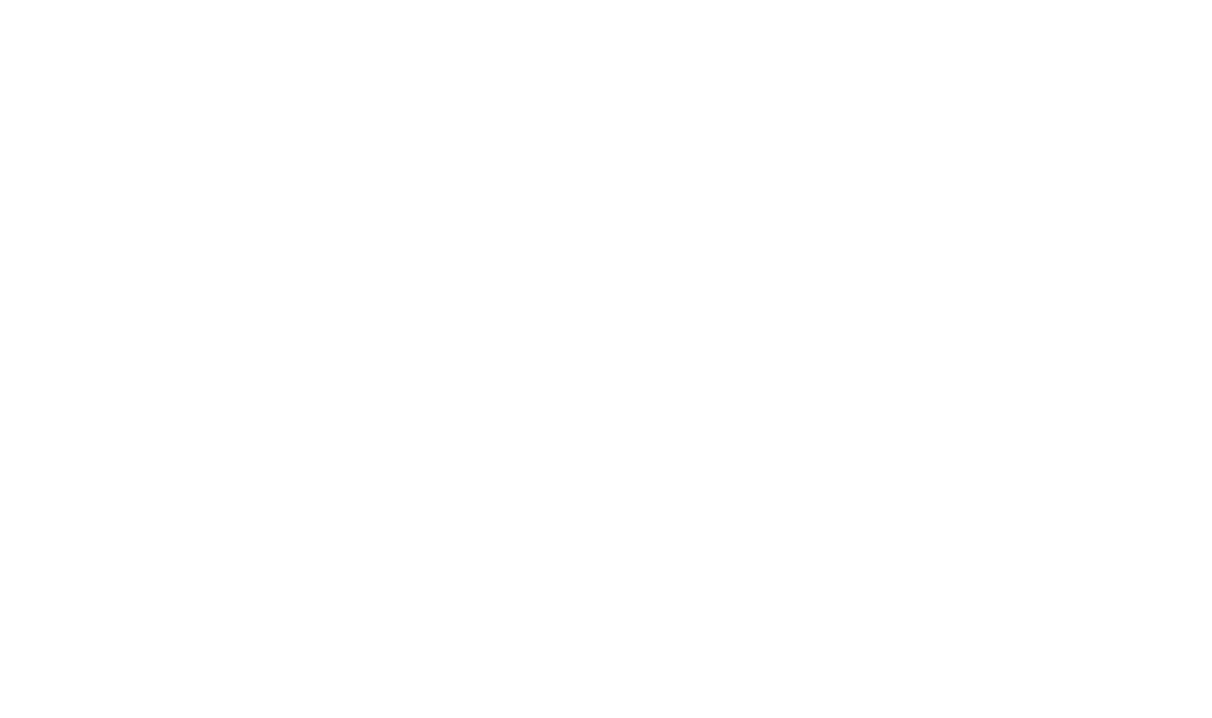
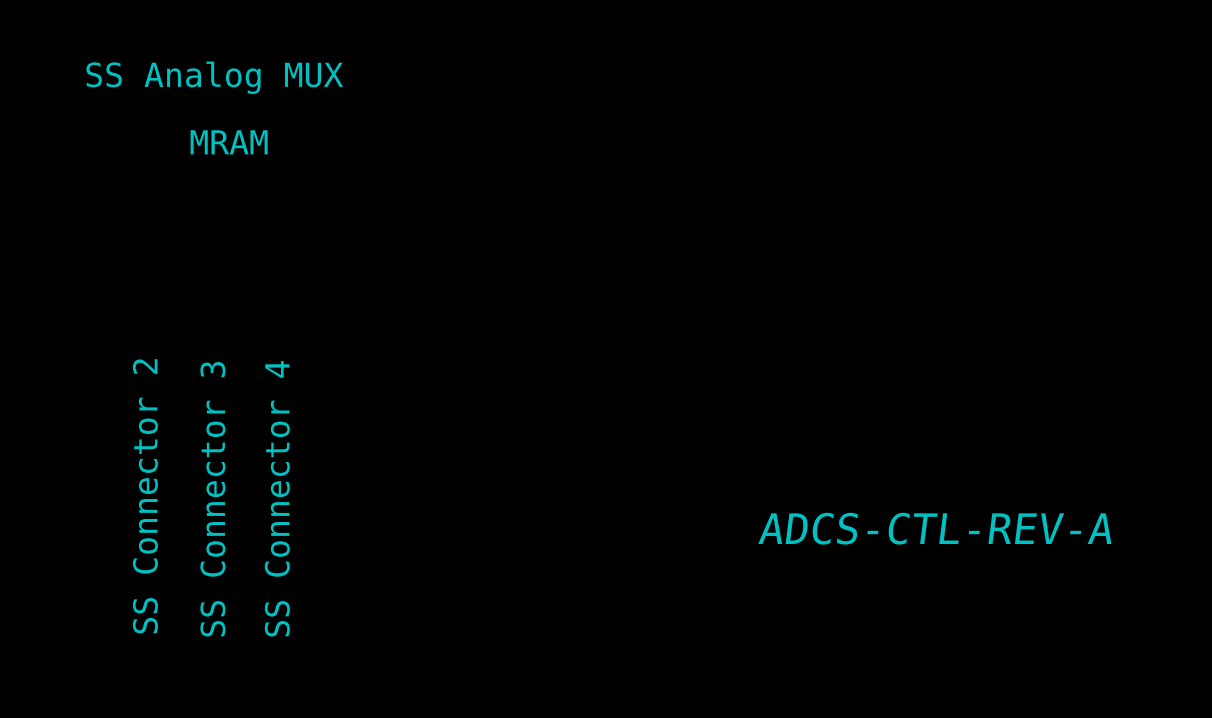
text: none -> SS Analog MUX (214, 77)
text: none -> MRAM (229, 142)
text: none -> SS Connector 2 (145, 496)
text: none -> SS Connector 4 (277, 498)
text: none -> SS Connector 3 (212, 499)
text: none -> ADCS-CTL-REV-A (934, 528)

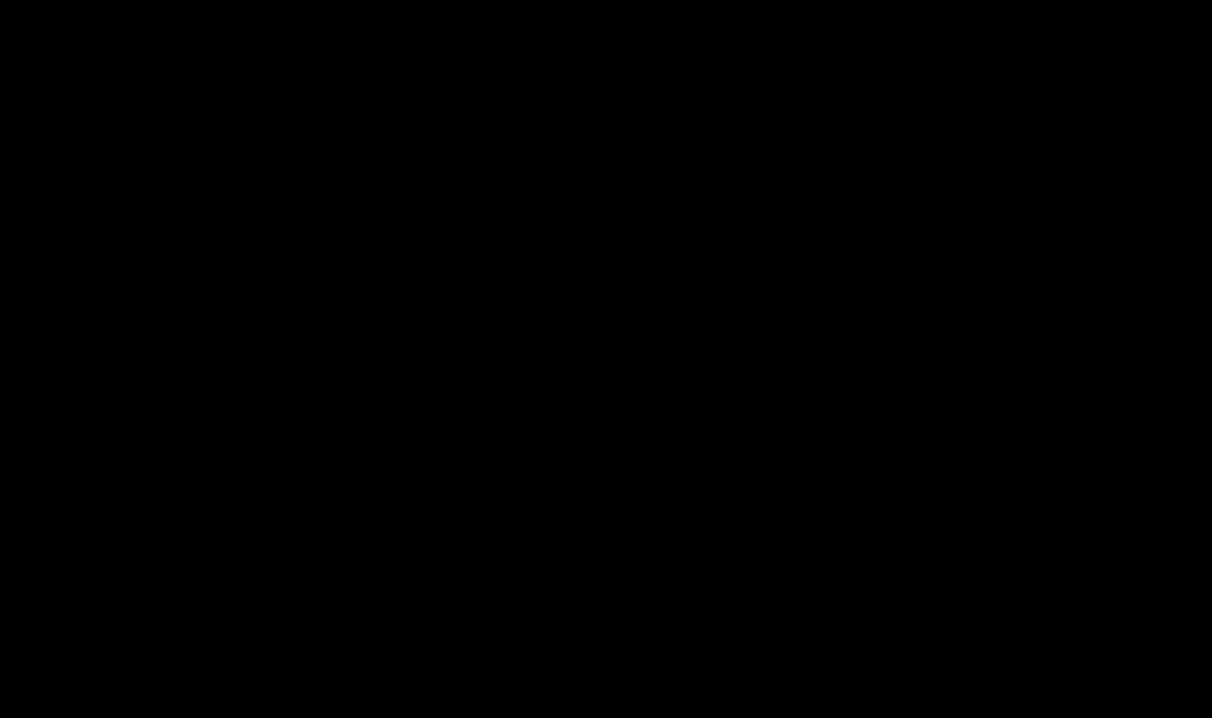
text: SS Analog MUX (214, 77) -> none
text: MRAM (229, 142) -> none
text: SS Connector 2 (145, 496) -> none
text: SS Connector 4 (277, 498) -> none
text: SS Connector 3 (212, 499) -> none
text: ADCS-CTL-REV-A (934, 528) -> none

